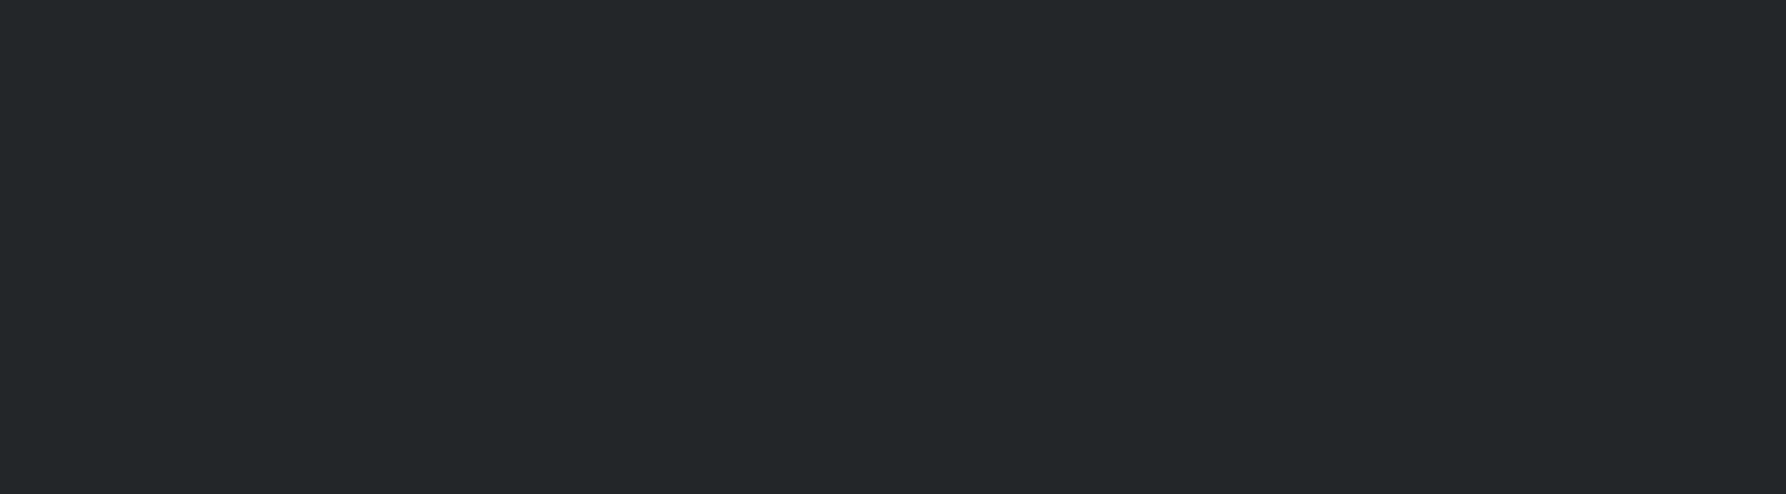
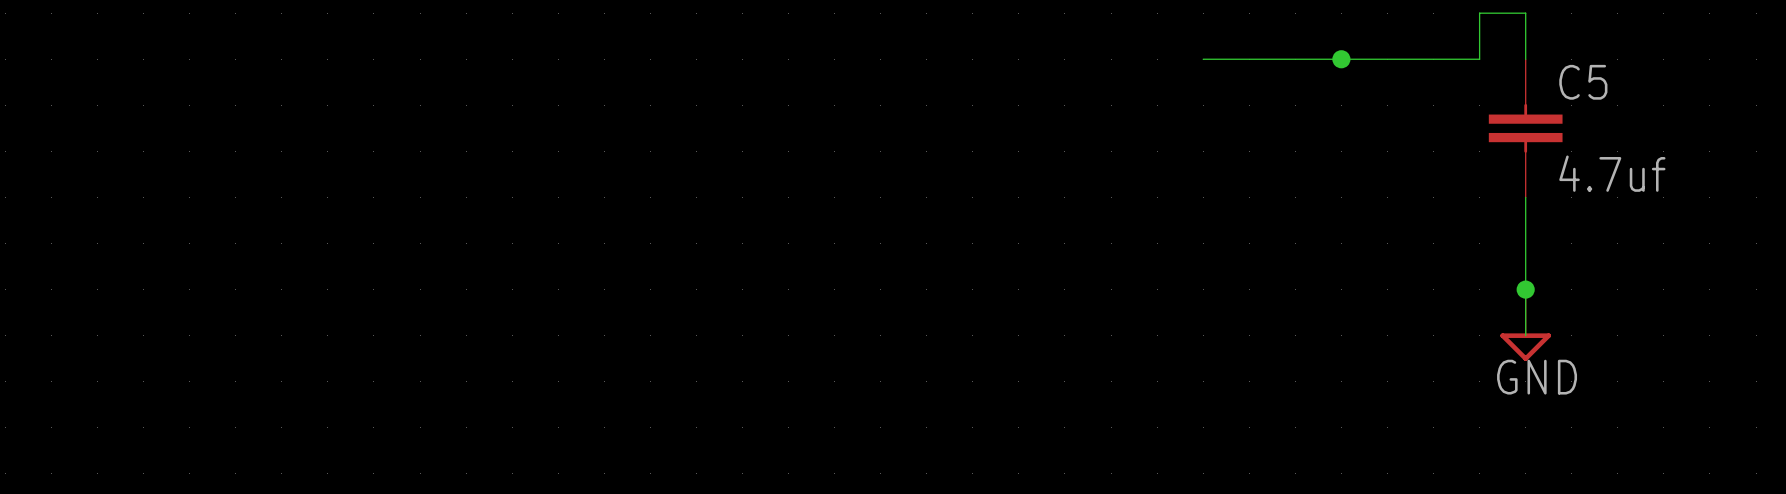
wire: none -> (1203, 59) (1479, 59) (1479, 13) (1525, 13) (1525, 59)
junction: none -> (1341, 59)
C5: none -> 4.7uf (1525, 128)
wire: none -> (1525, 197) (1525, 335)
junction: none -> (1525, 289)
power symbol: none -> GND (1525, 325)

